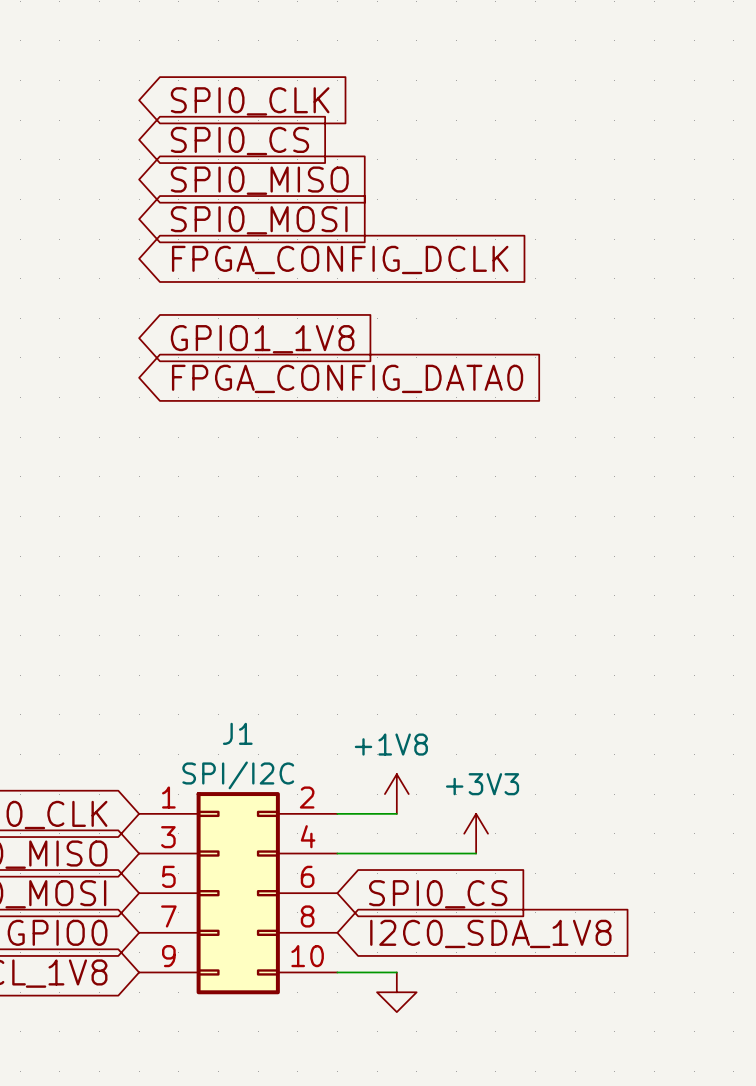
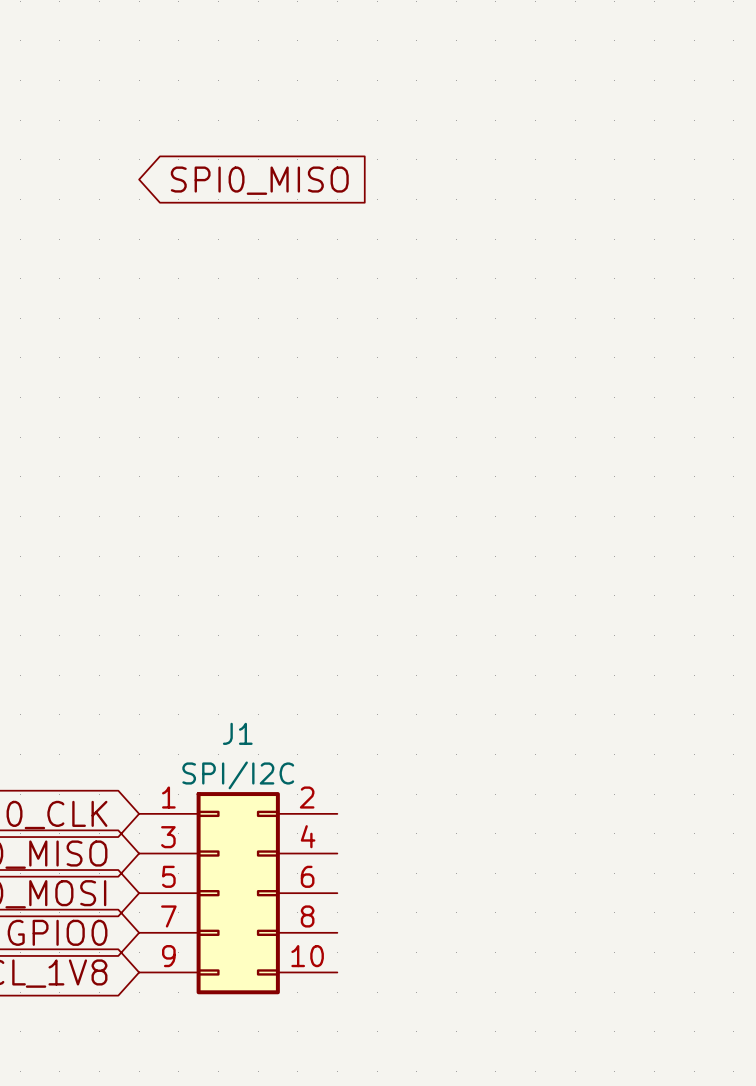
global label: SPI0_CLK (250, 101) -> none
global label: SPI0_CS (239, 141) -> none
global label: SPI0_MOSI (259, 220) -> none
global label: FPGA_CONFIG_DCLK (340, 259) -> none
global label: GPIO1_1V8 (262, 339) -> none
global label: FPGA_CONFIG_DATA0 (347, 378) -> none
power symbol: +1V8 (396, 794) -> none
wire: (337, 813) (396, 813) -> none
power symbol: +3V3 (476, 833) -> none
wire: (337, 853) (476, 853) -> none
global label: SPI0_CS (438, 894) -> none
global label: I2C0_SDA_1V8 (490, 933) -> none
wire: (337, 972) (396, 972) -> none
power symbol: (396, 992) -> none

